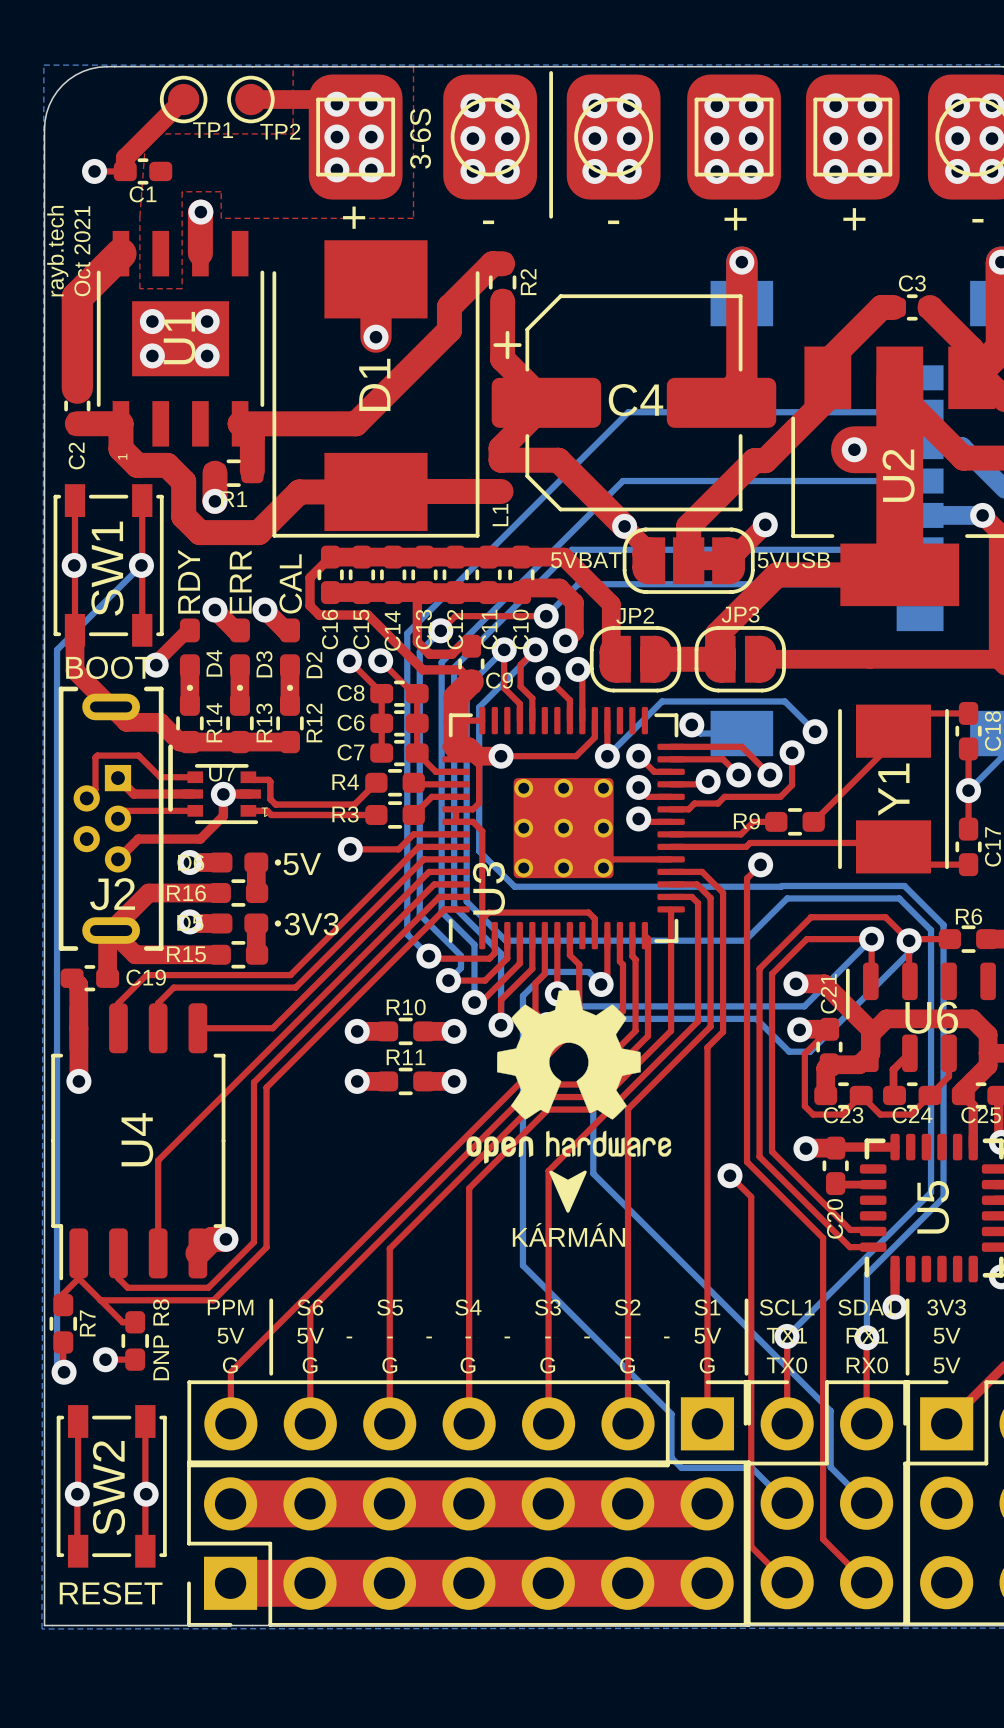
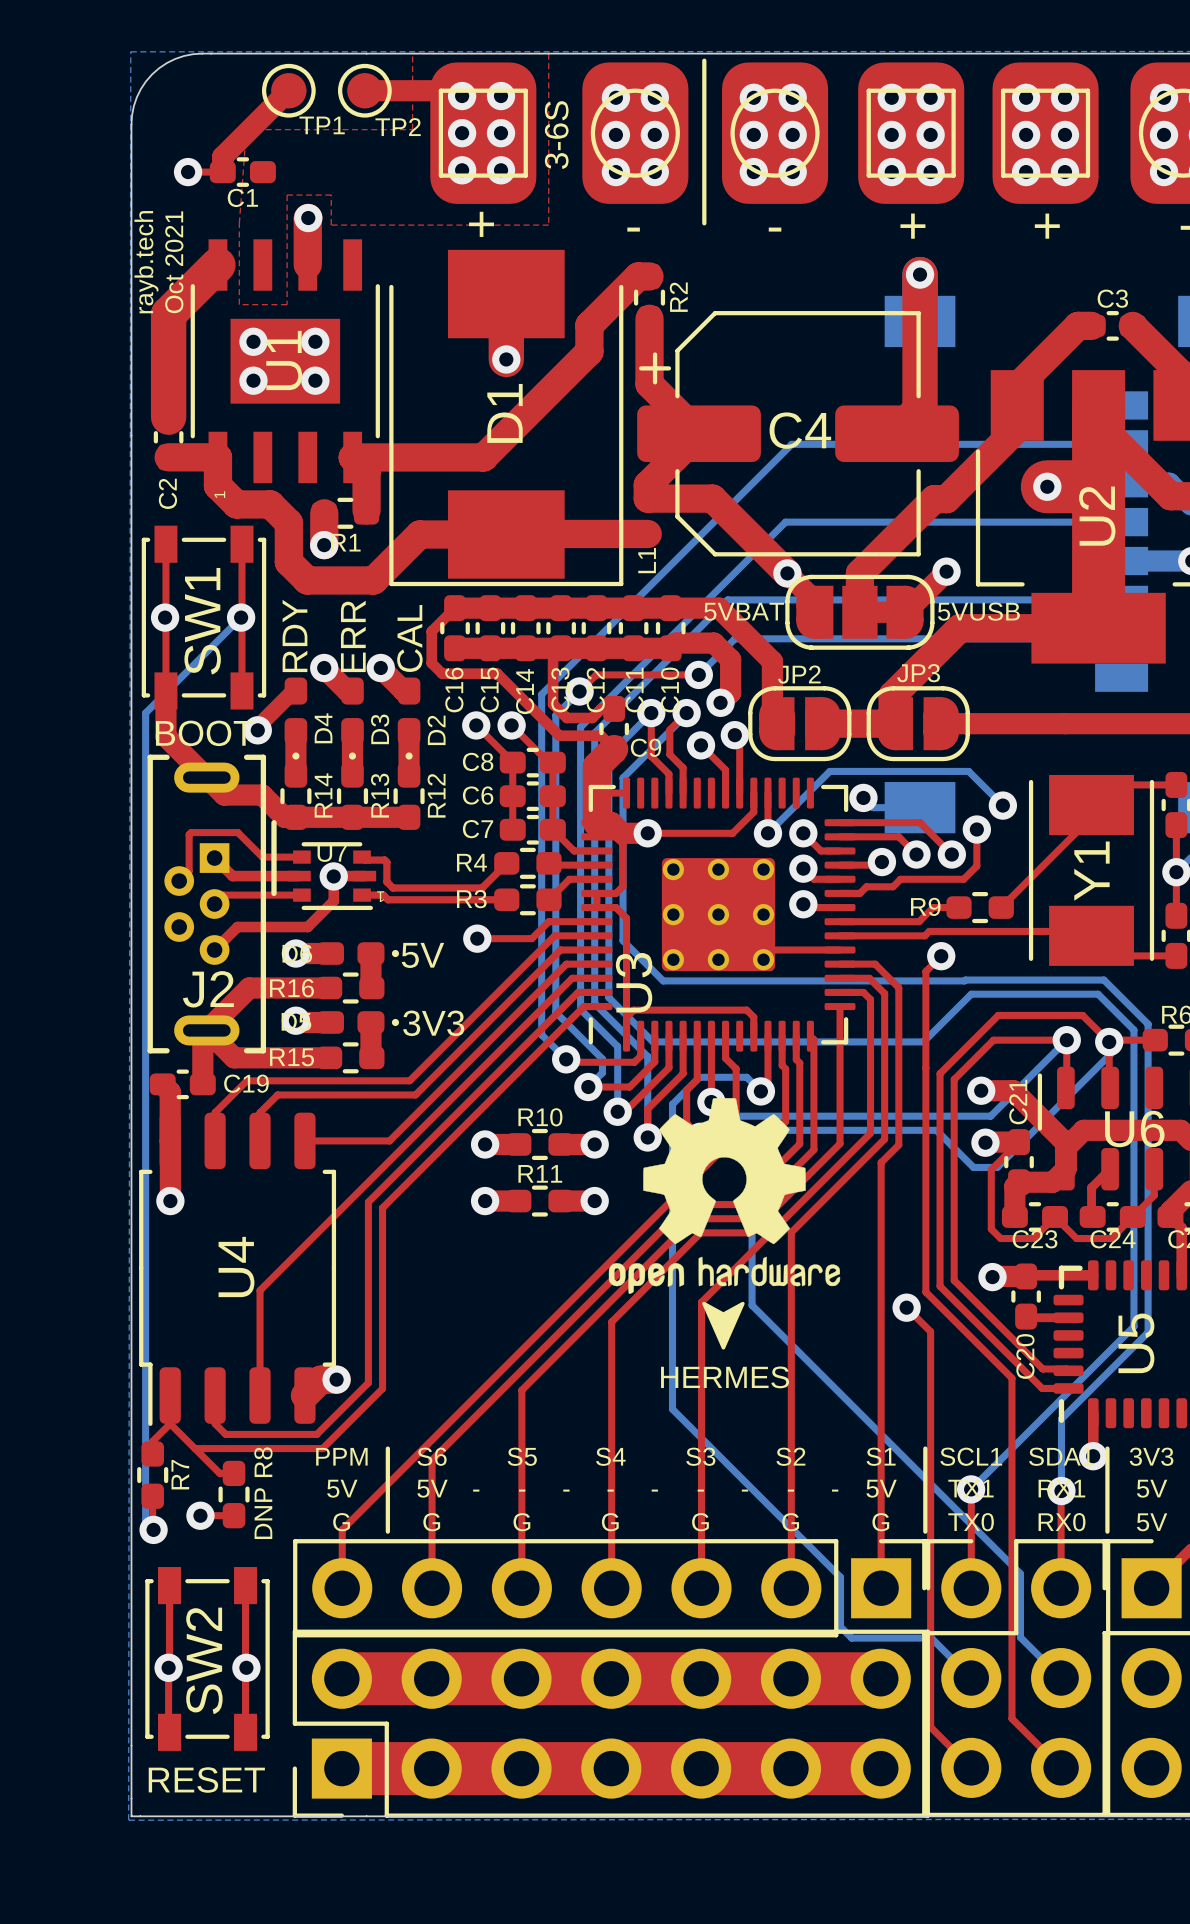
text: KÁRMÁN (568, 1234) -> HERMES (725, 1377)

